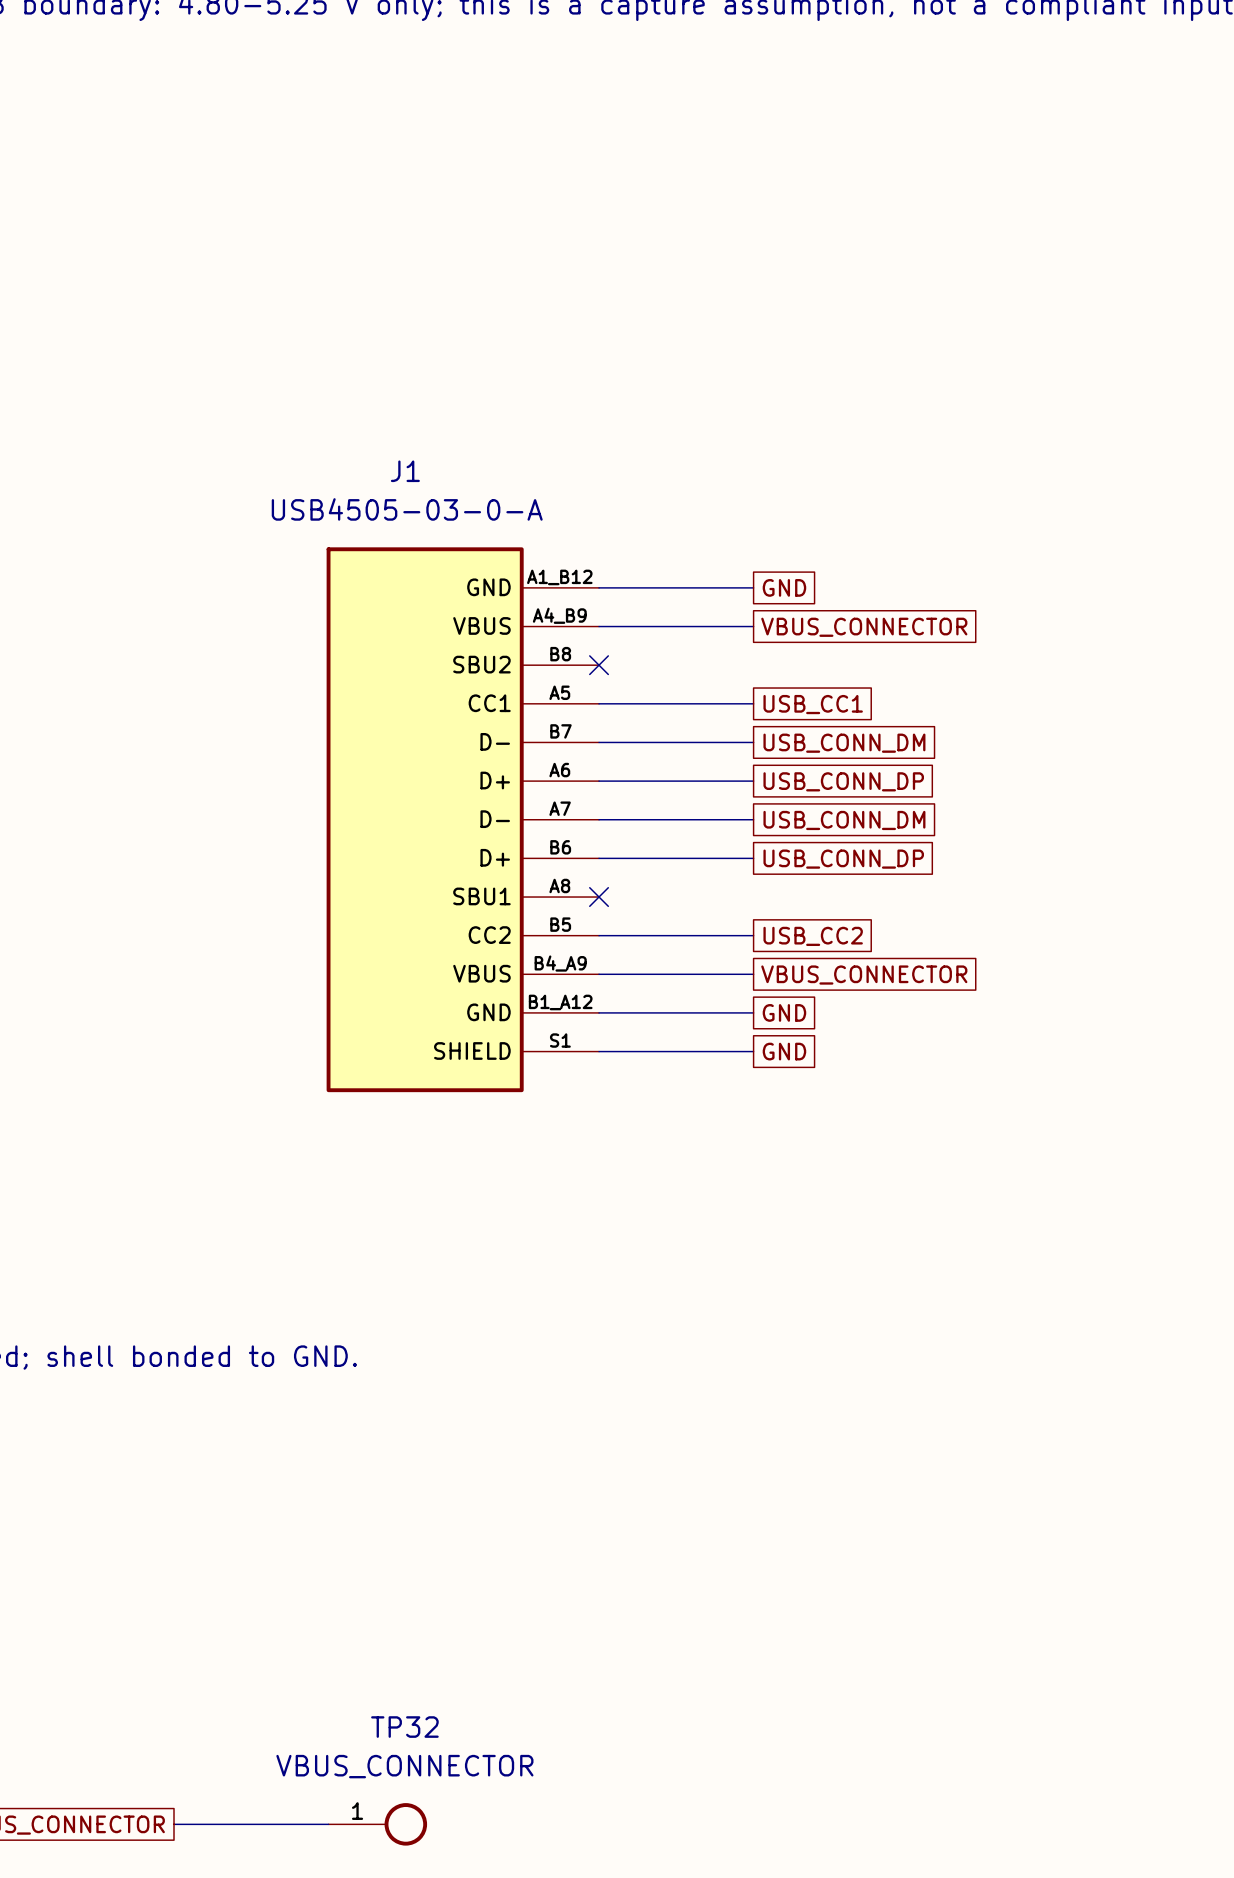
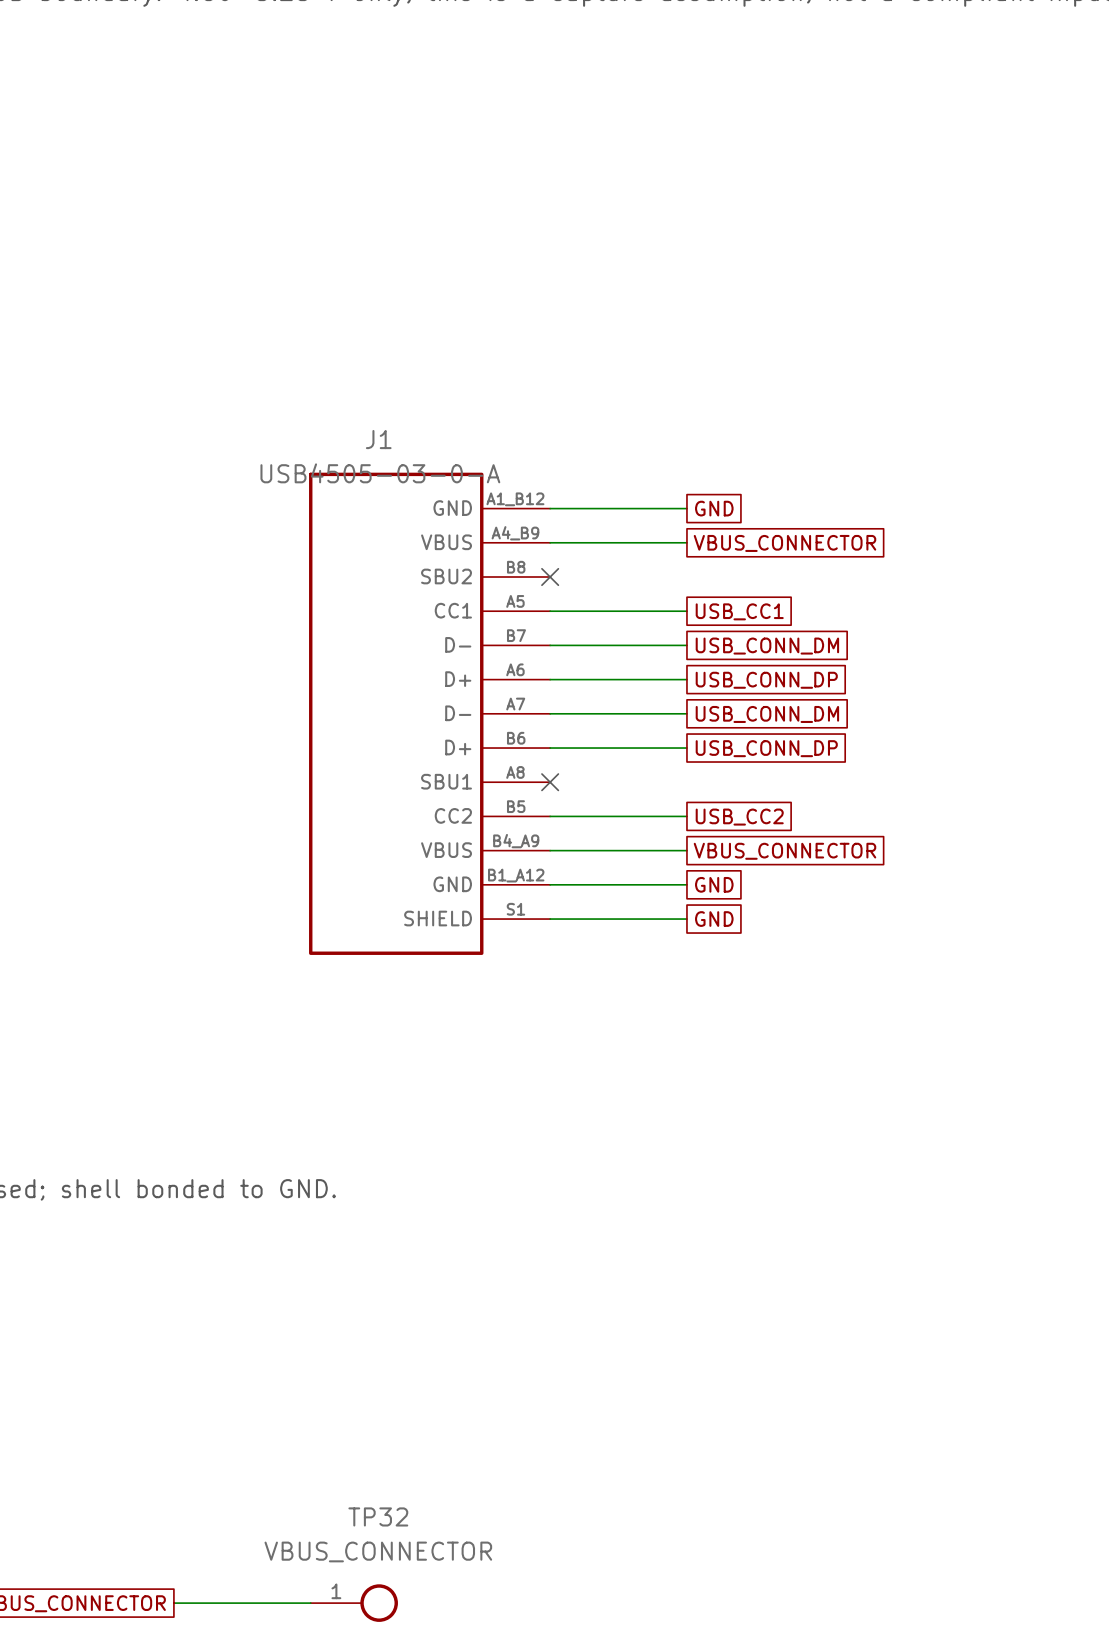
J1 name position: J1 (405, 471) -> J1 (378, 439)
J1 value position: USB4505-03-0-A (407, 509) -> USB4505-03-0-A (380, 473)

